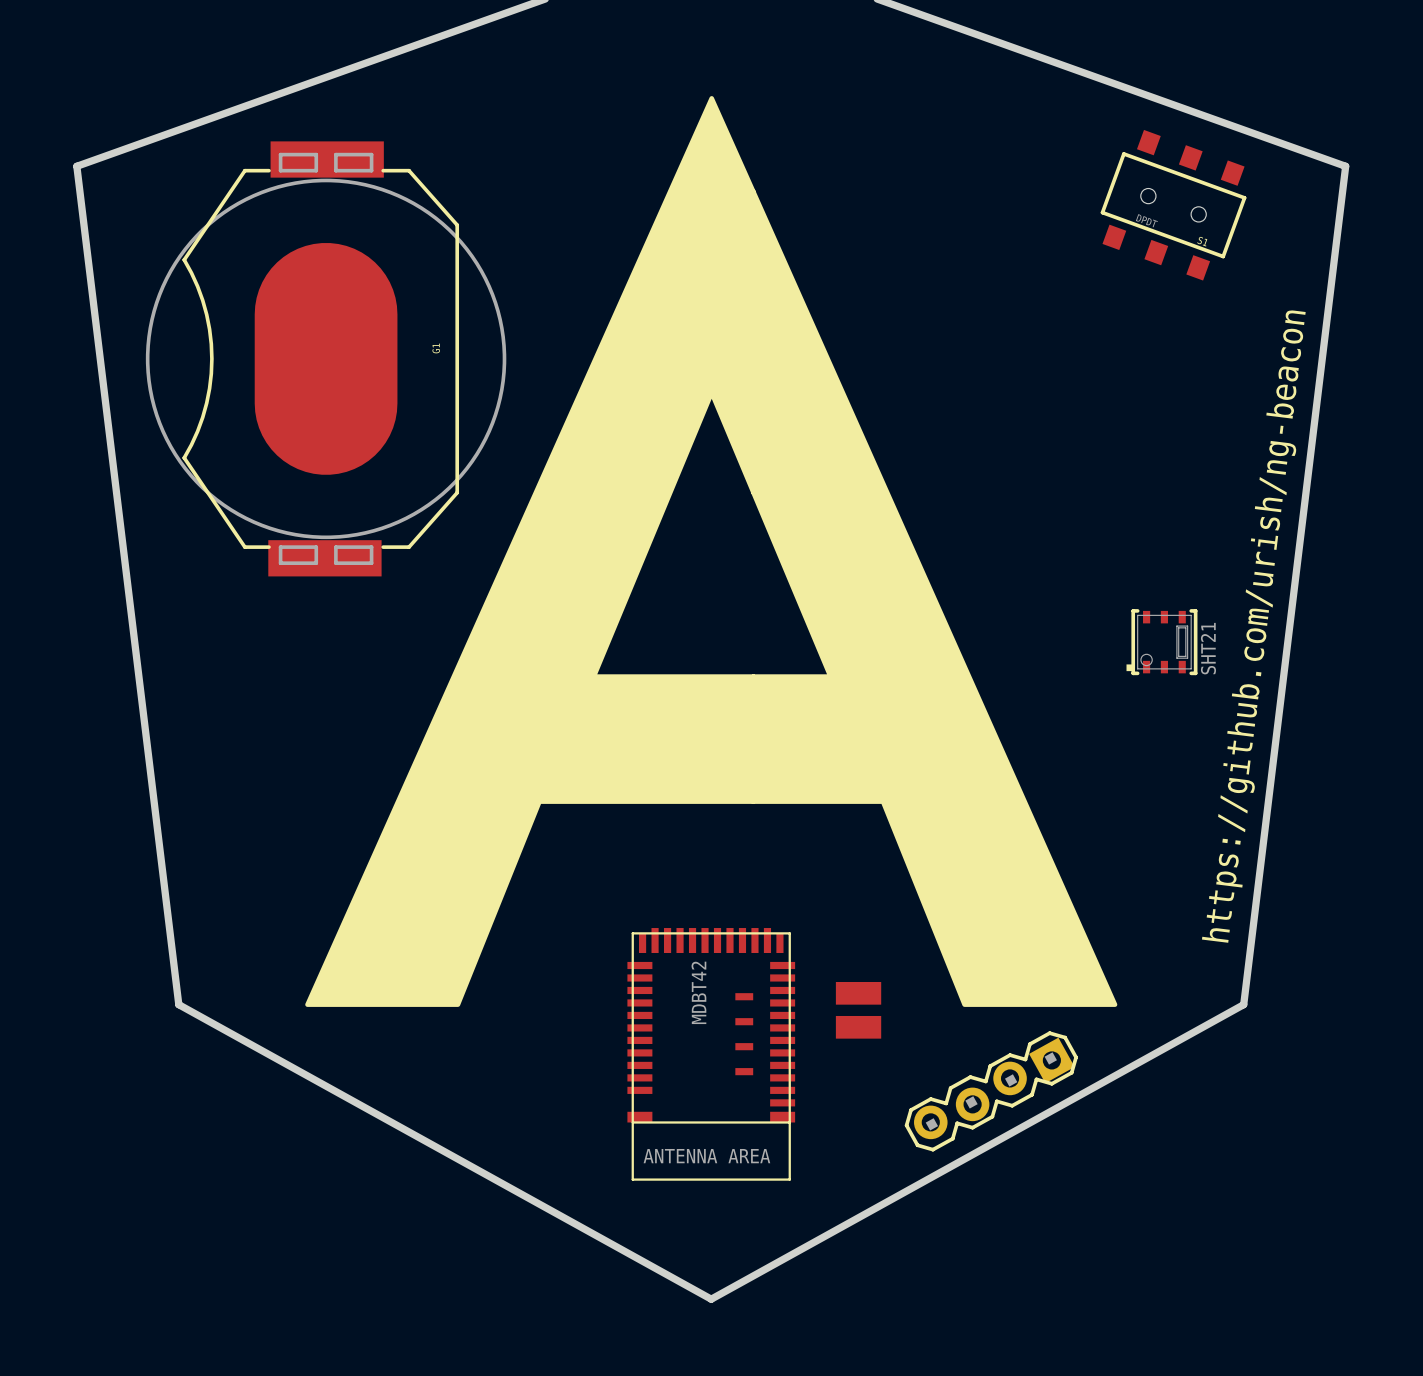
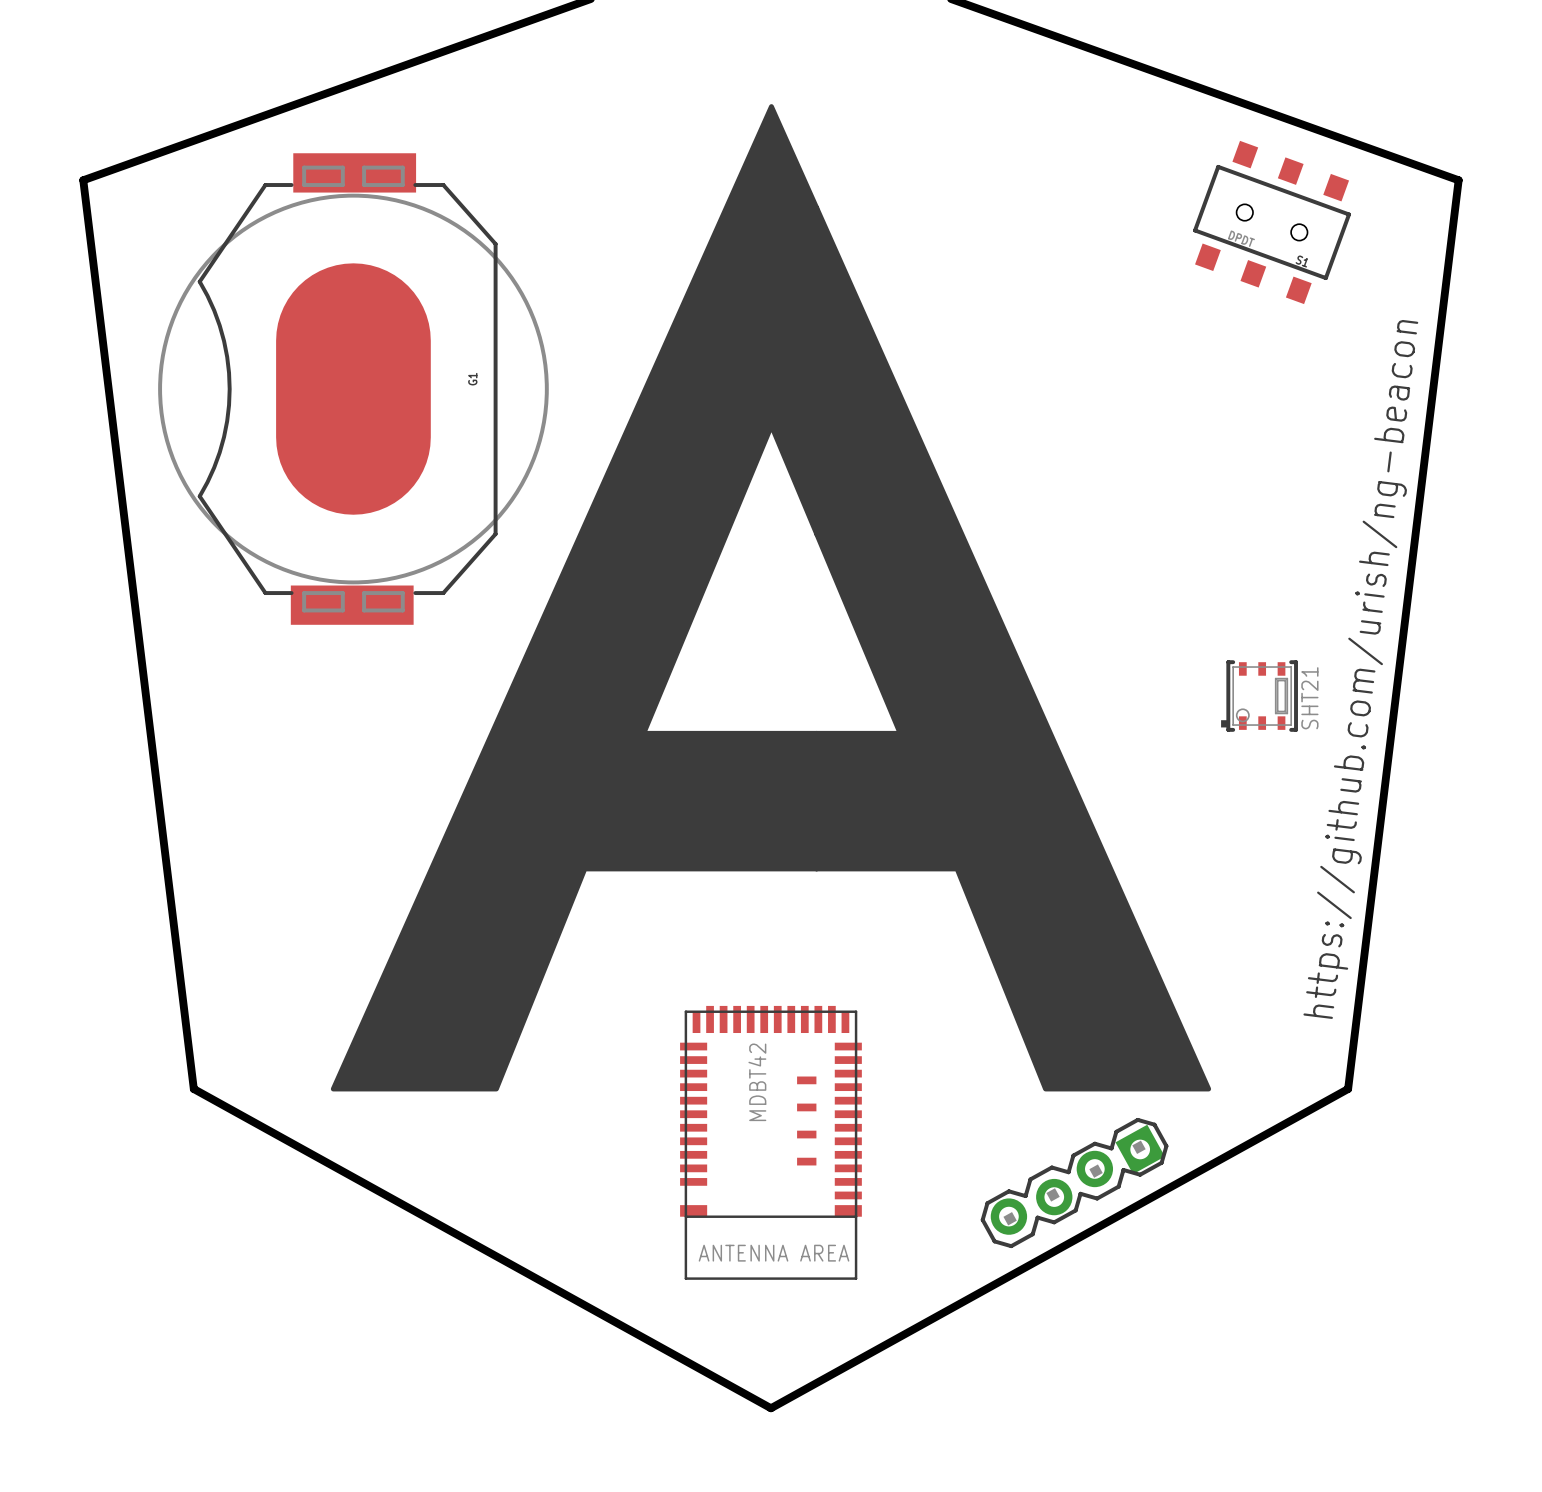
part: (858, 993) -> none
part: (858, 1027) -> none

